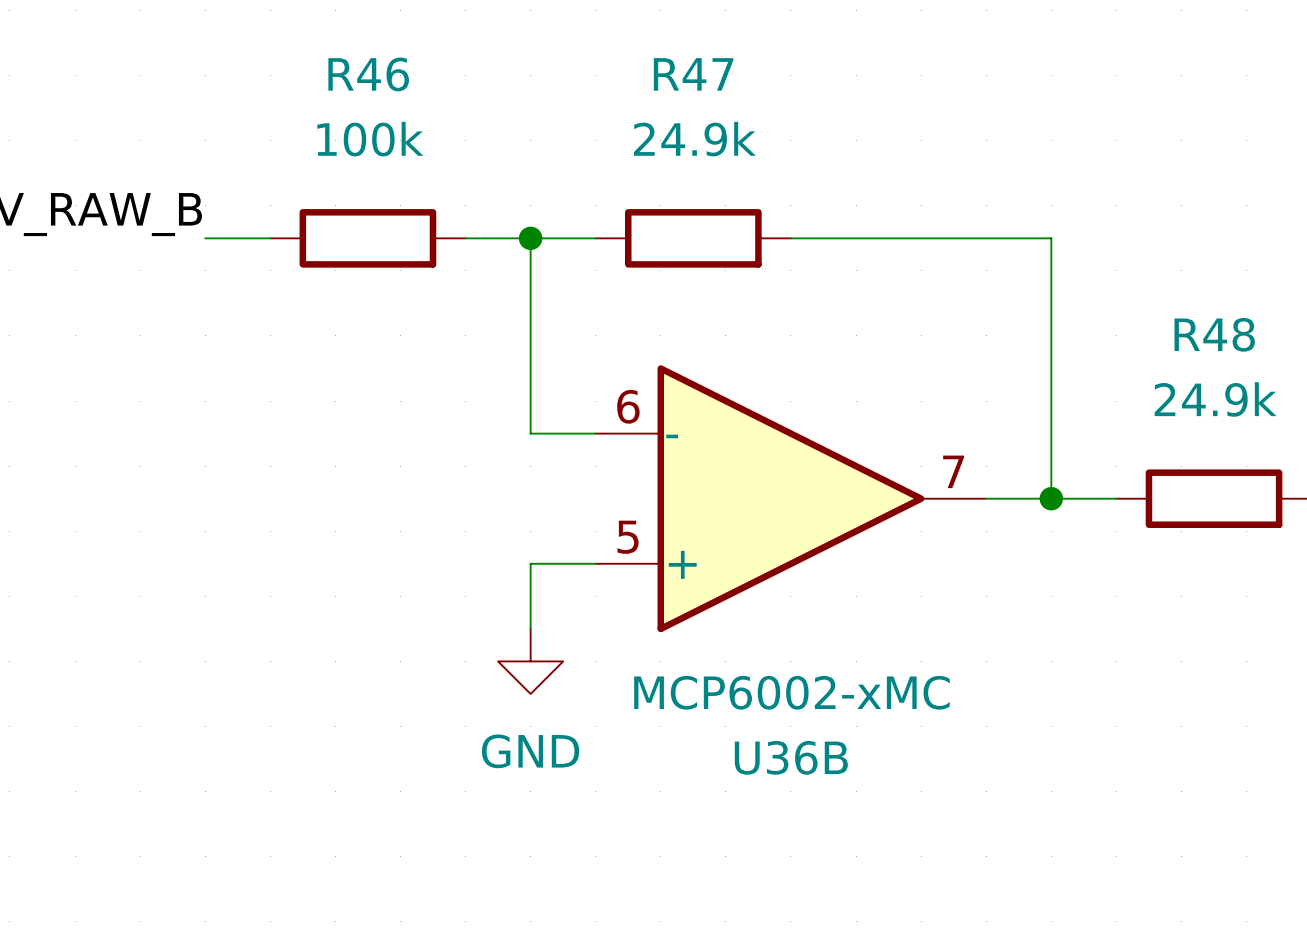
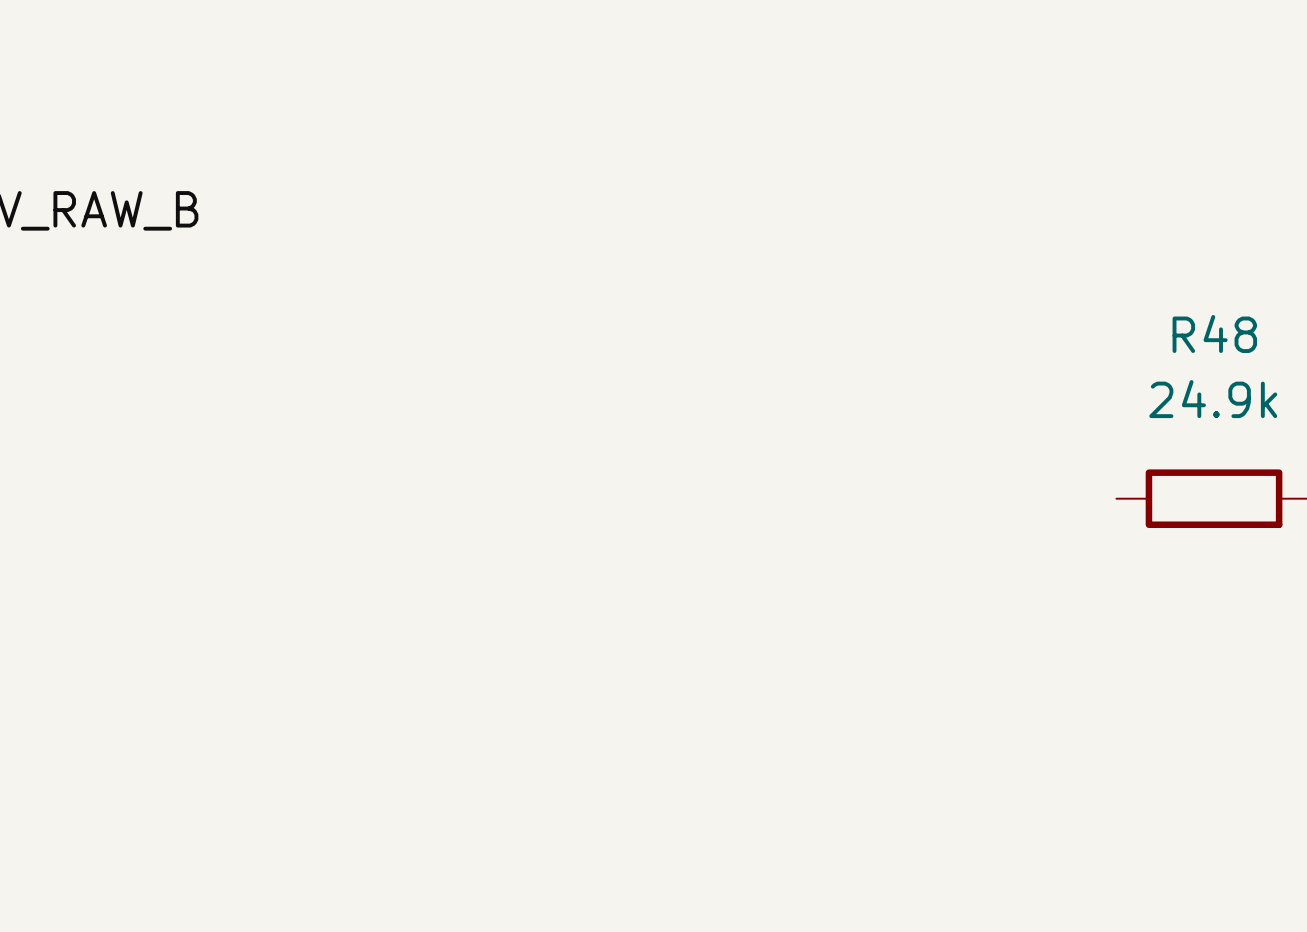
wire: (205, 238) (270, 238) -> none
R46: 100k (367, 238) -> none
wire: (465, 238) (595, 238) -> none
wire: (530, 238) (530, 433) (595, 433) -> none
junction: (530, 238) -> none
R47: 24.9k (693, 238) -> none
wire: (790, 238) (1051, 238) (1051, 498) -> none
U36B: MCP6002-xMC (790, 498) -> none
wire: (986, 498) (1116, 498) -> none
junction: (1051, 498) -> none
wire: (595, 563) (530, 563) (530, 628) -> none
power symbol: GND (530, 661) -> none

